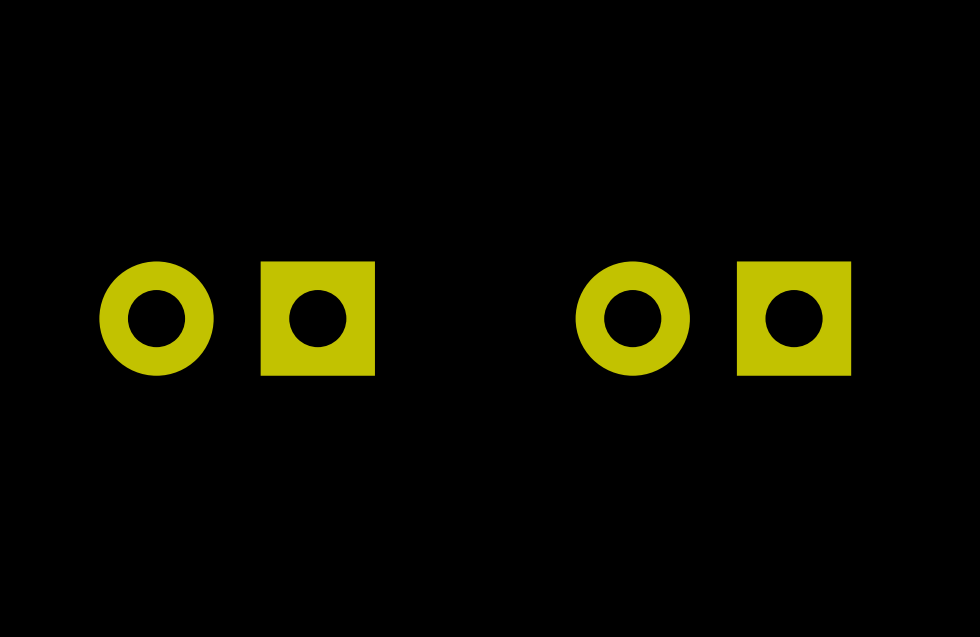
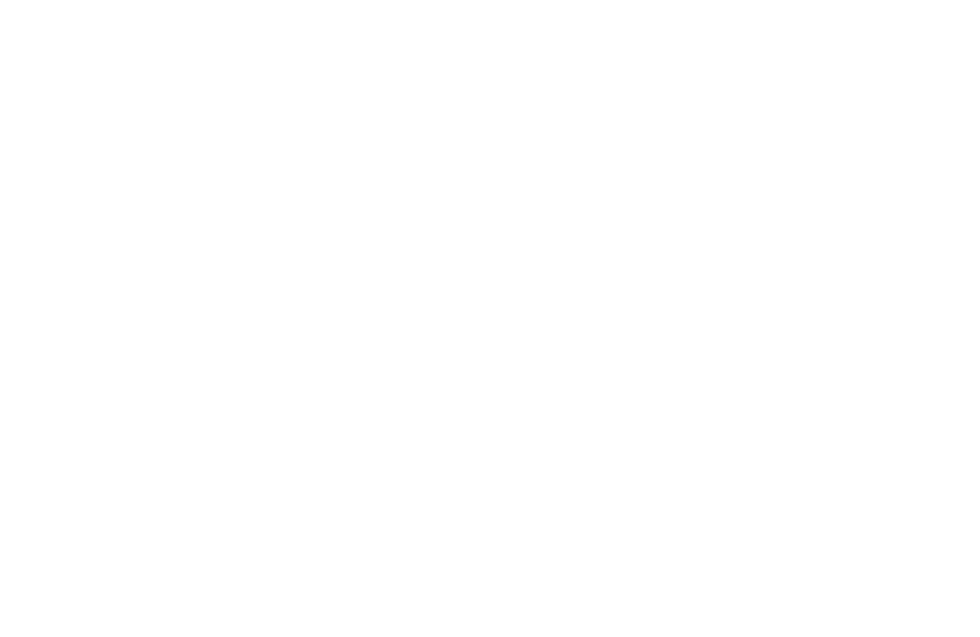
part: (237, 318) -> none
part: (713, 318) -> none

